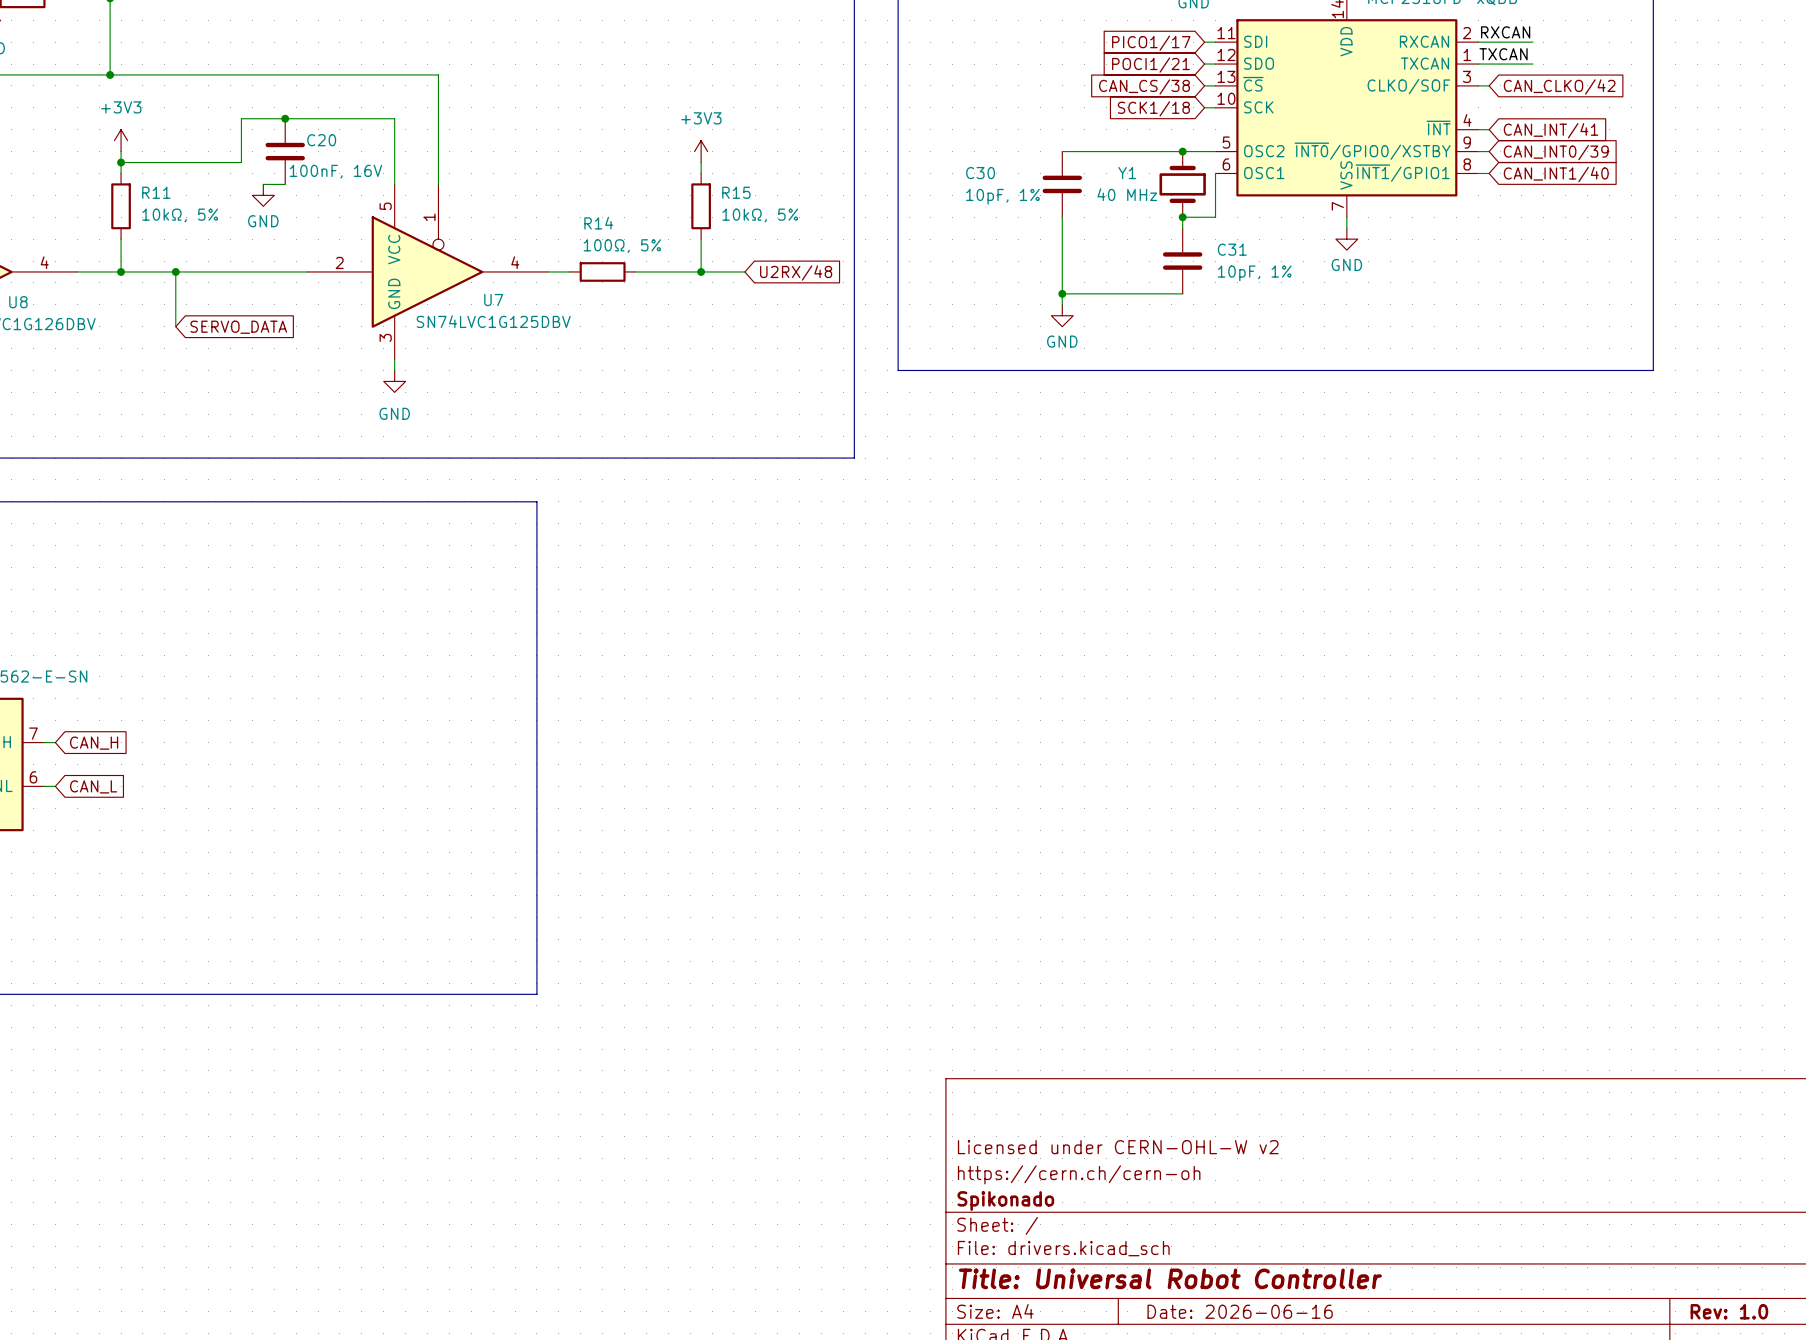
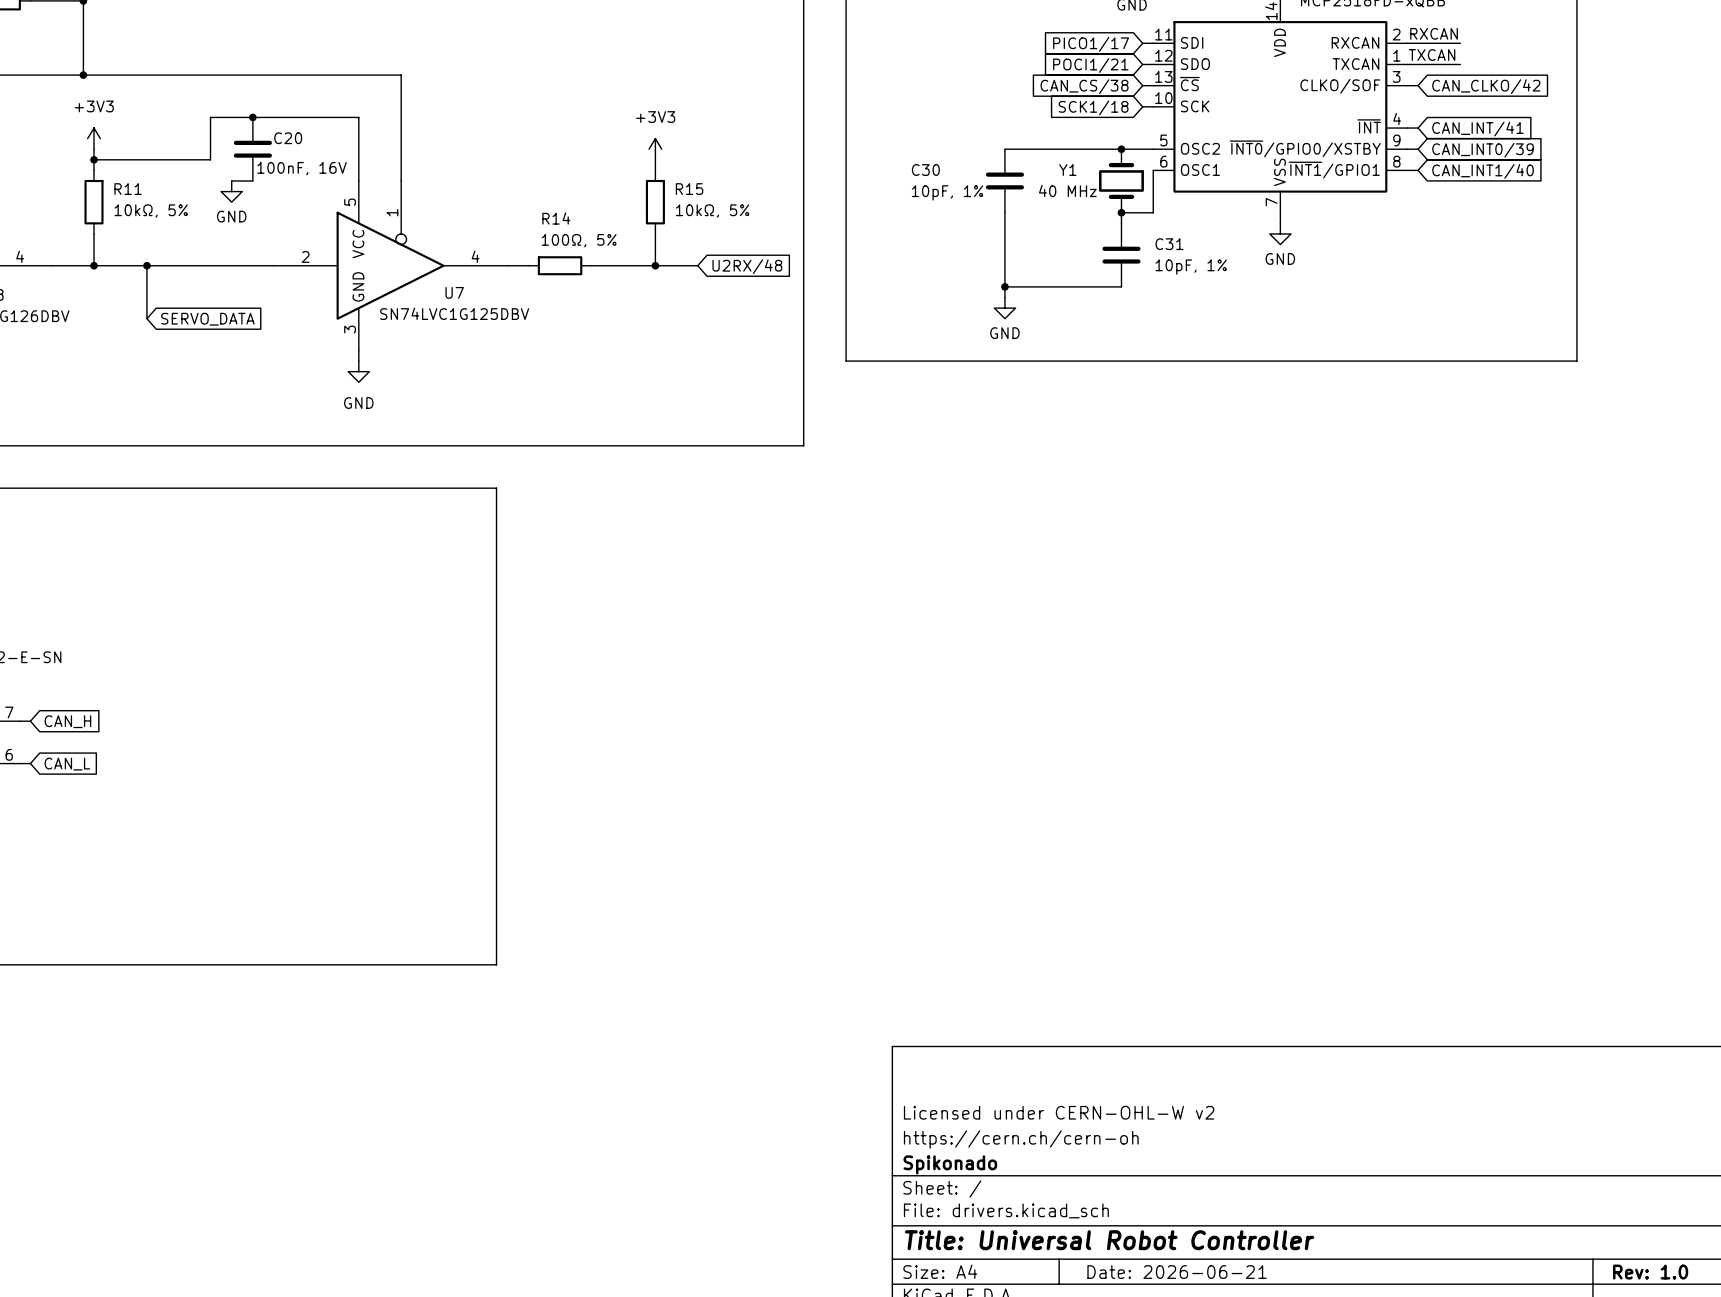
title block: Date: 2026-06-16 (1240, 1311) -> Date: 2026-06-21 (1177, 1272)

